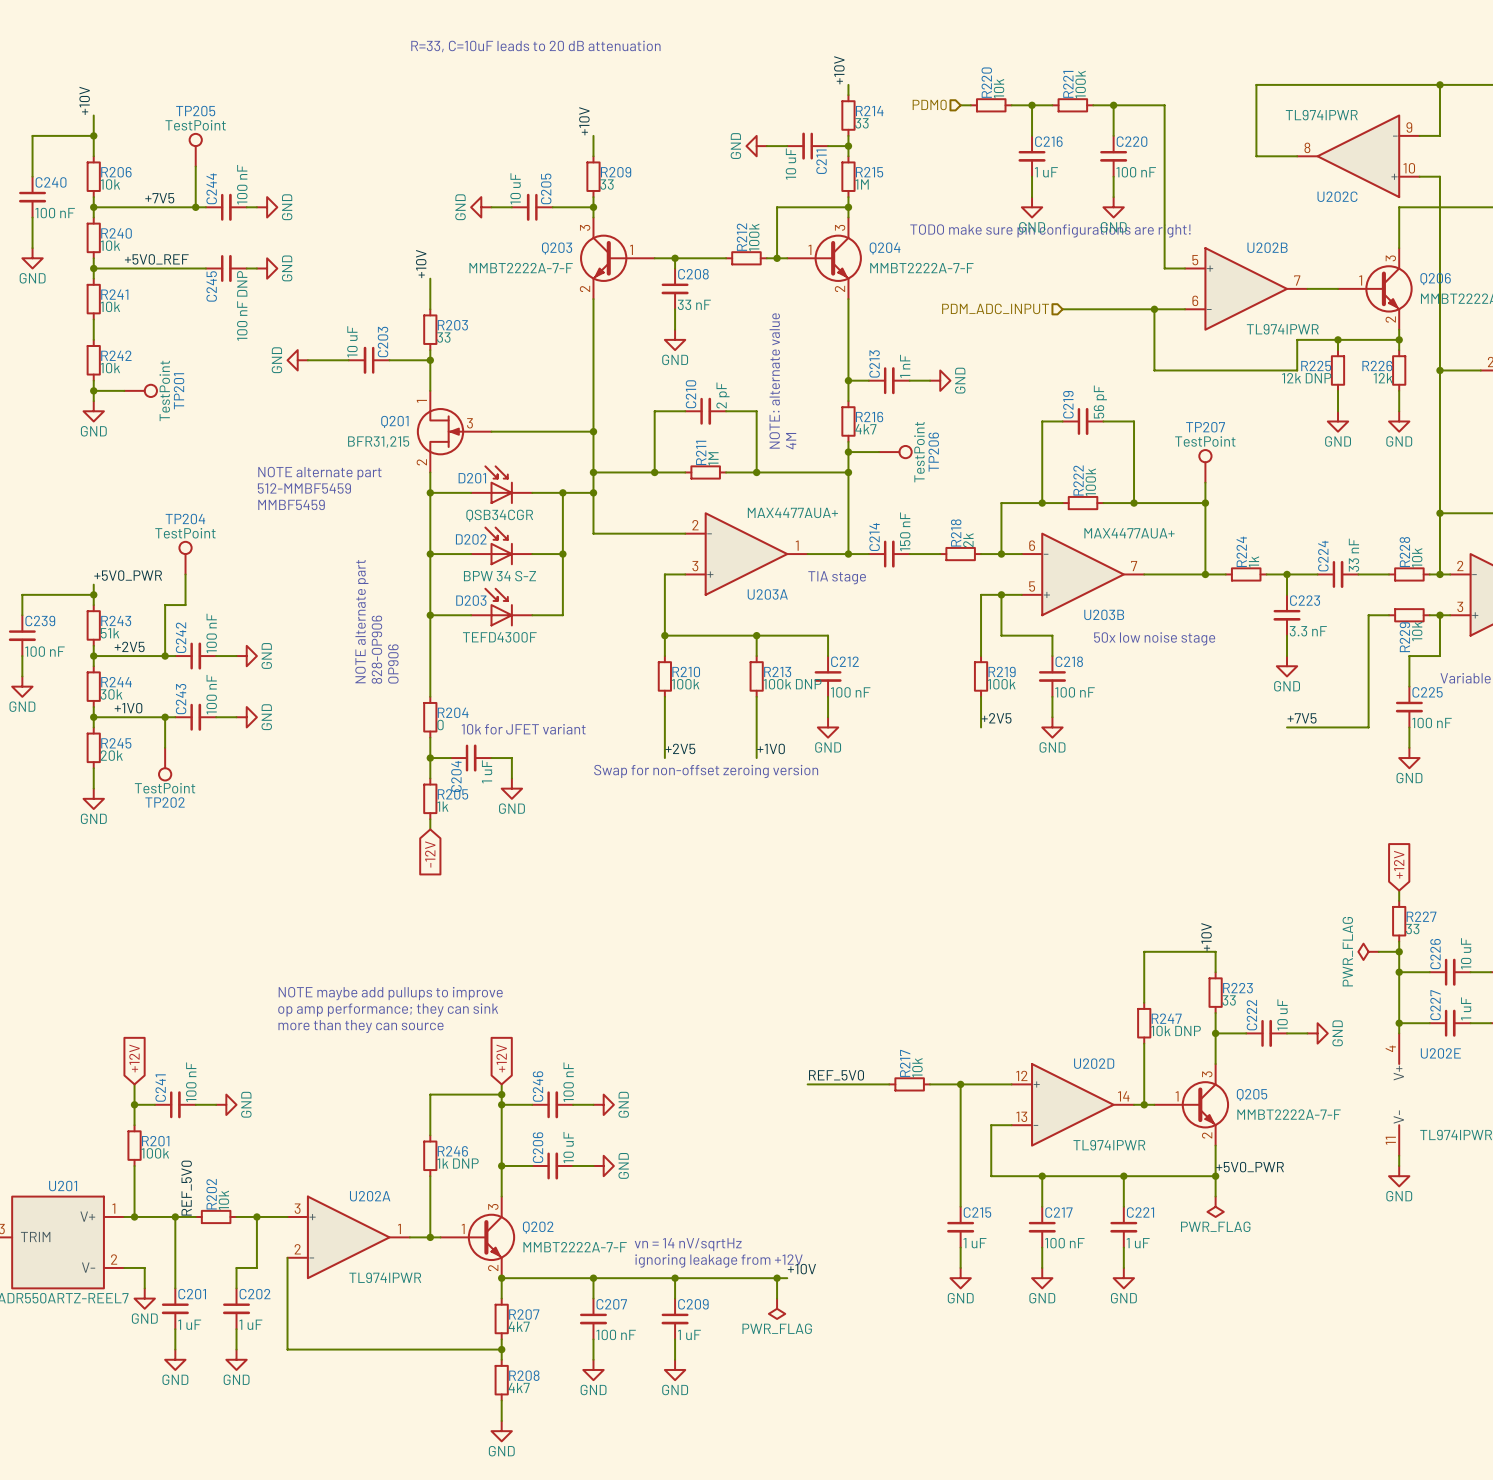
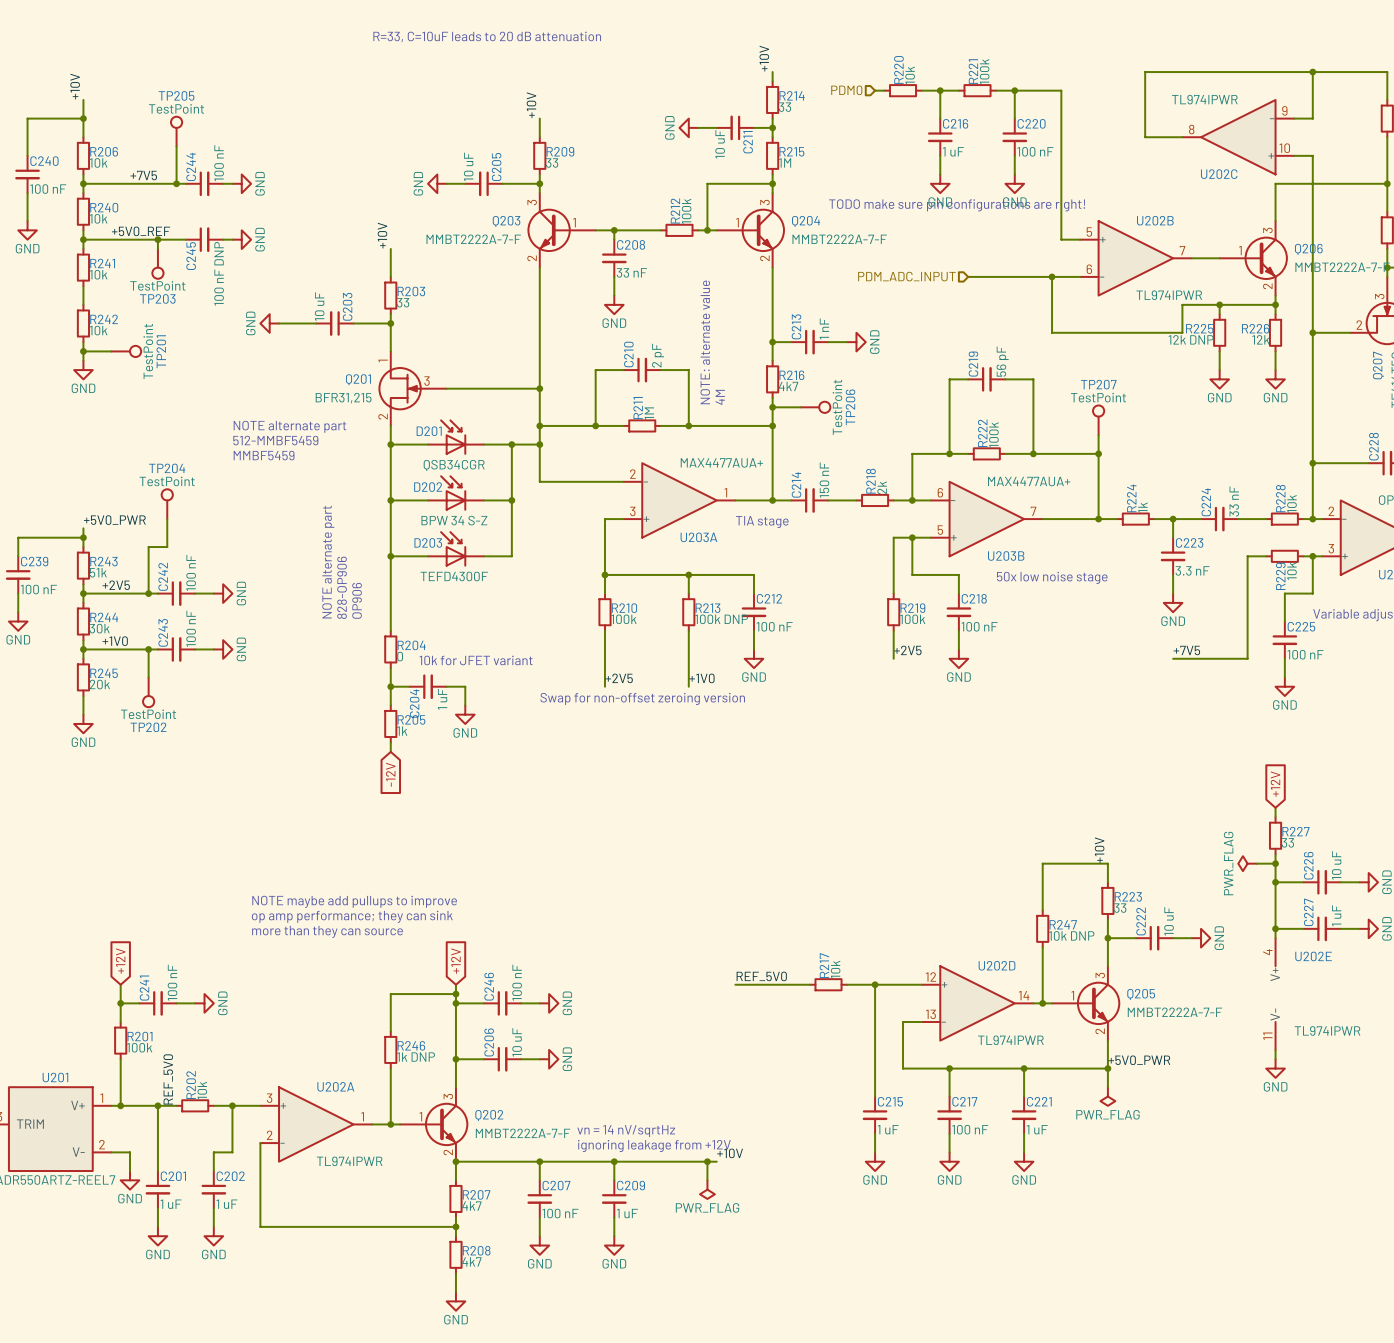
wire: none -> (157, 239) (157, 248)
junction: none -> (157, 239)
TP203: none -> TestPoint (157, 263)

